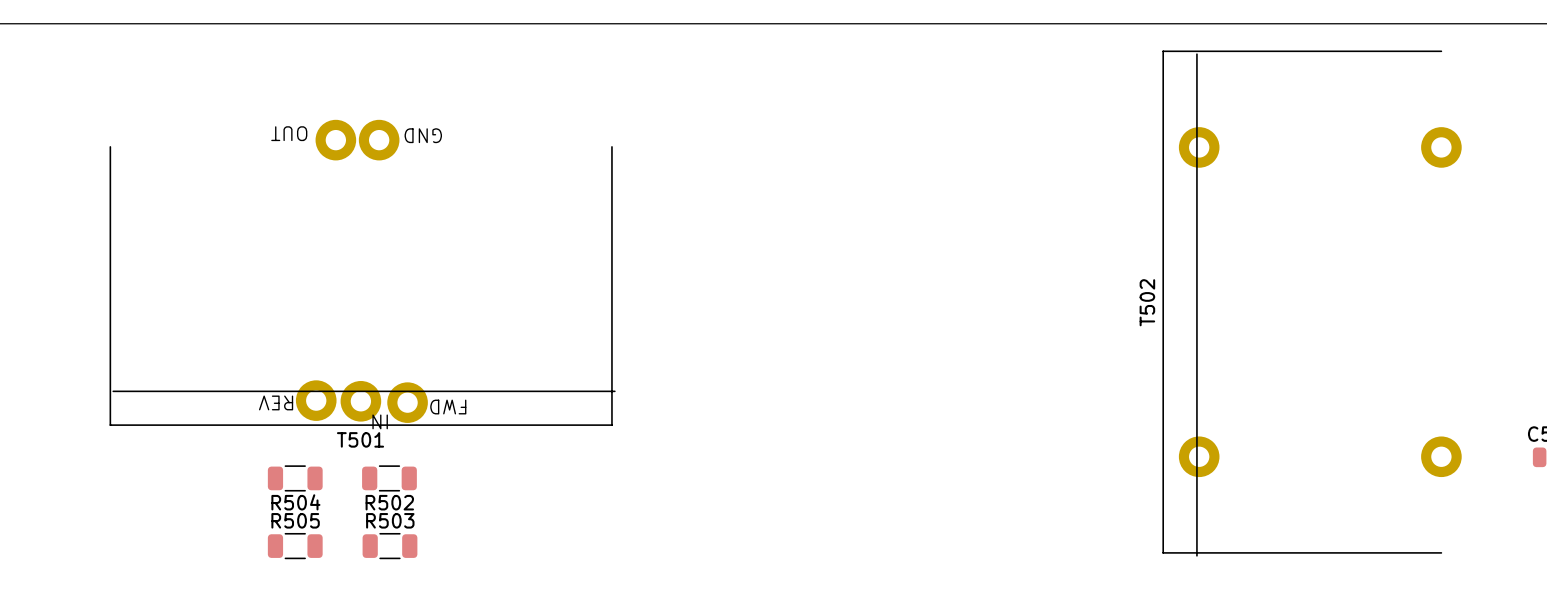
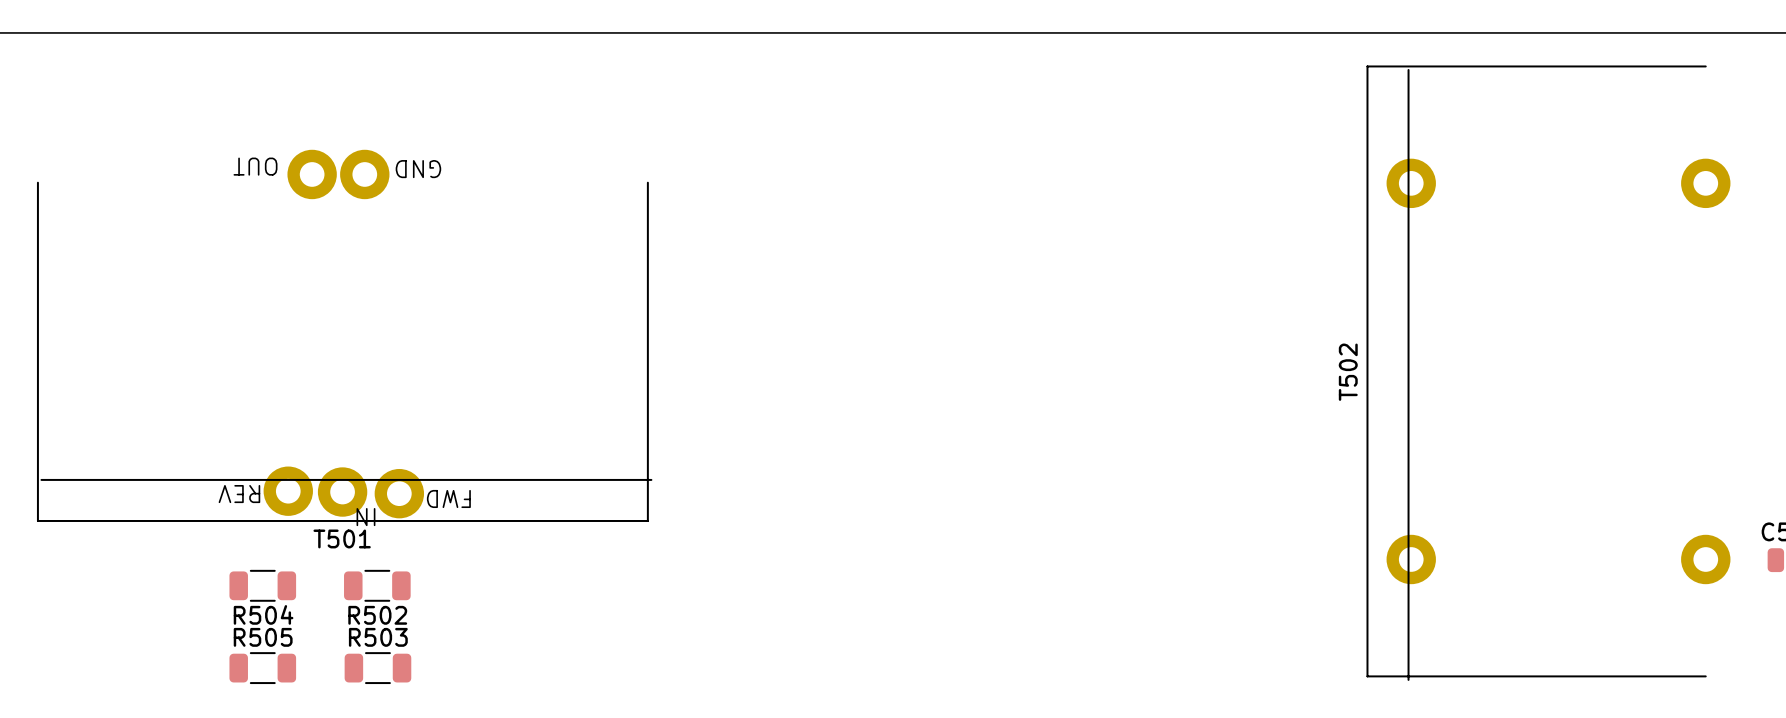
T502 position: (1312, 303) -> (1548, 373)

